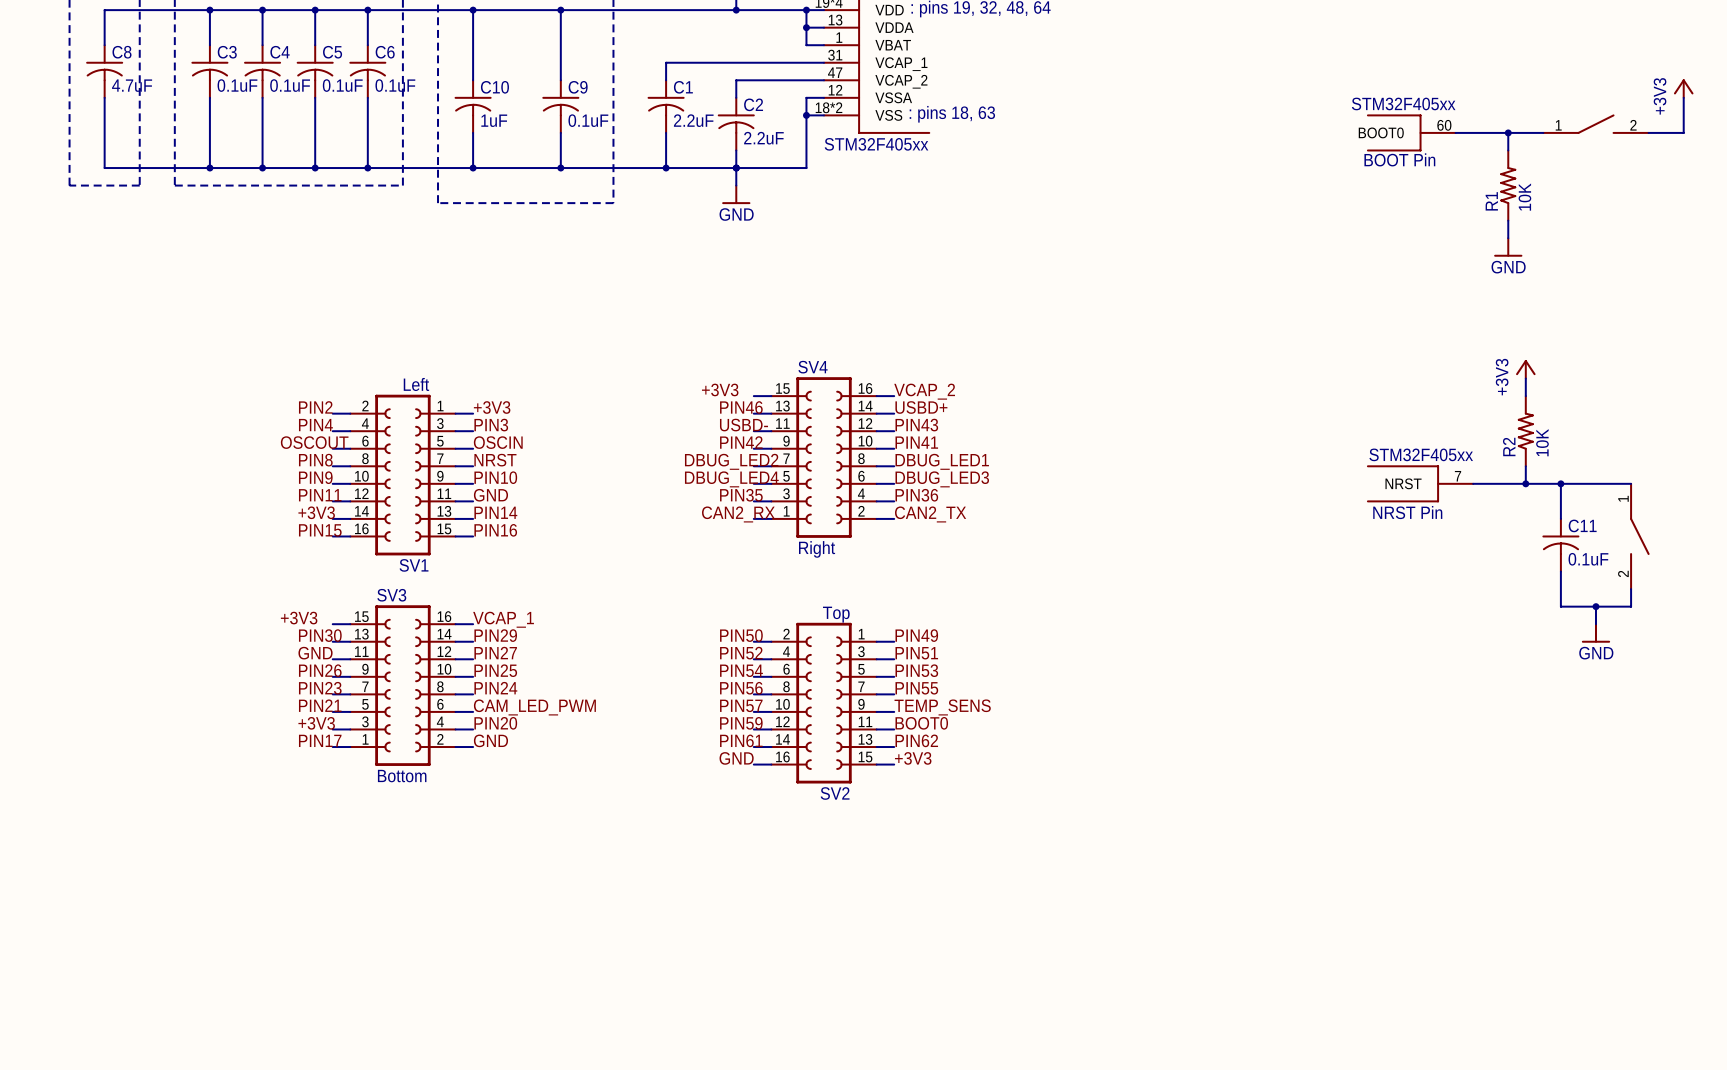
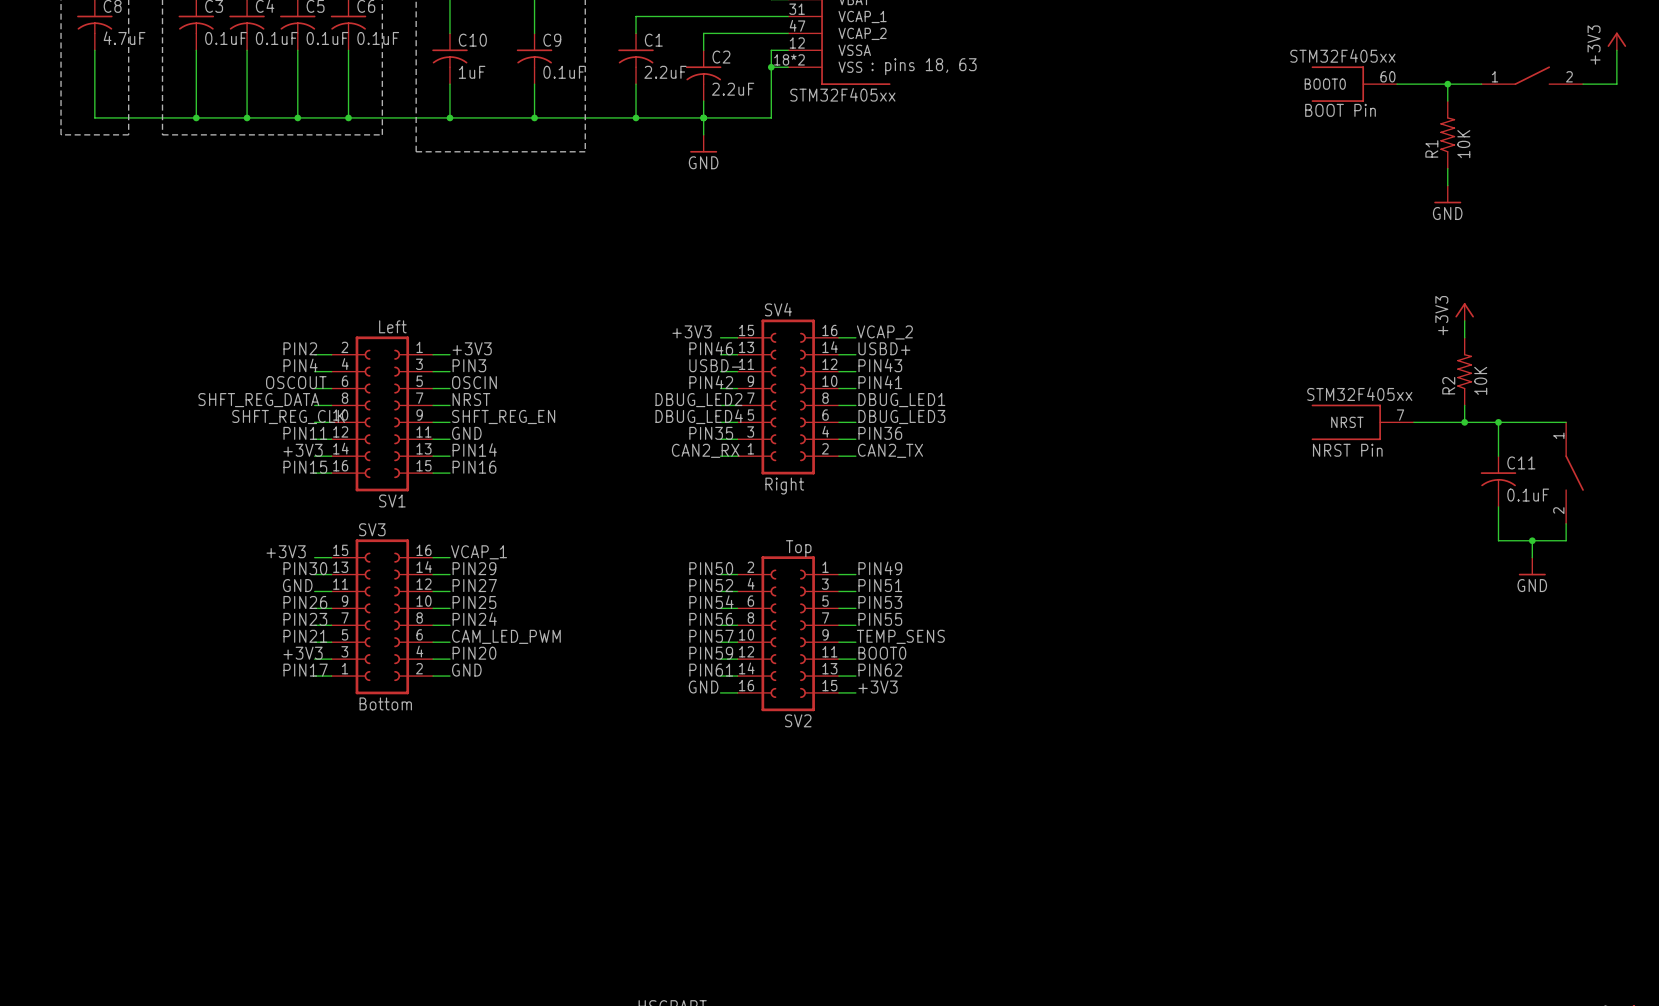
label: PIN8 (315, 460) -> none
label: none -> SHFT_REG_DATA (258, 400)
label: PIN9 (315, 477) -> none
label: PIN10 (495, 477) -> SHFT_REG_EN (503, 417)
label: none -> SHFT_REG_CLK (288, 417)

